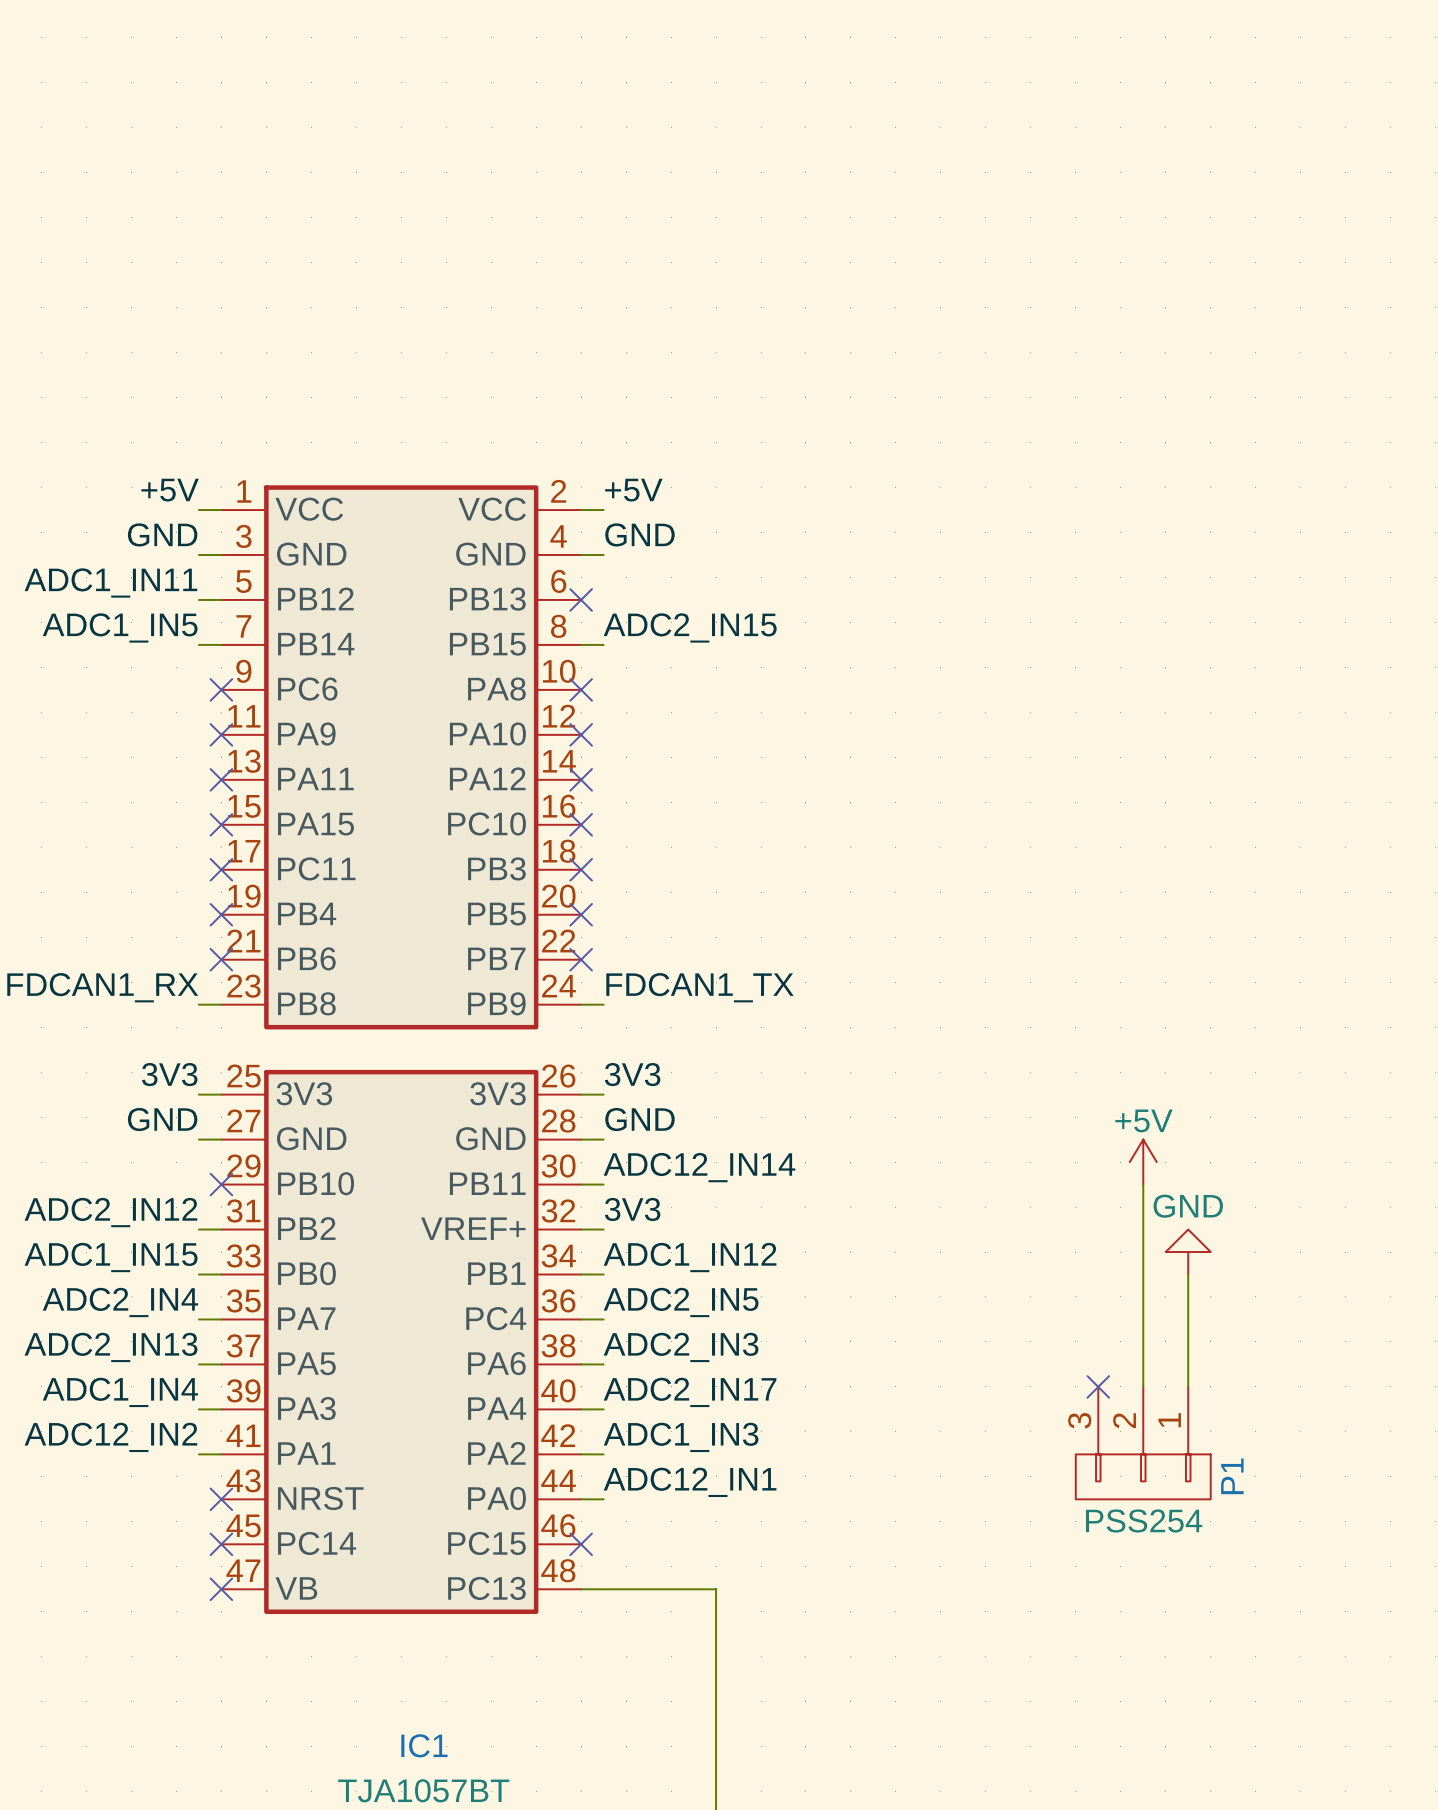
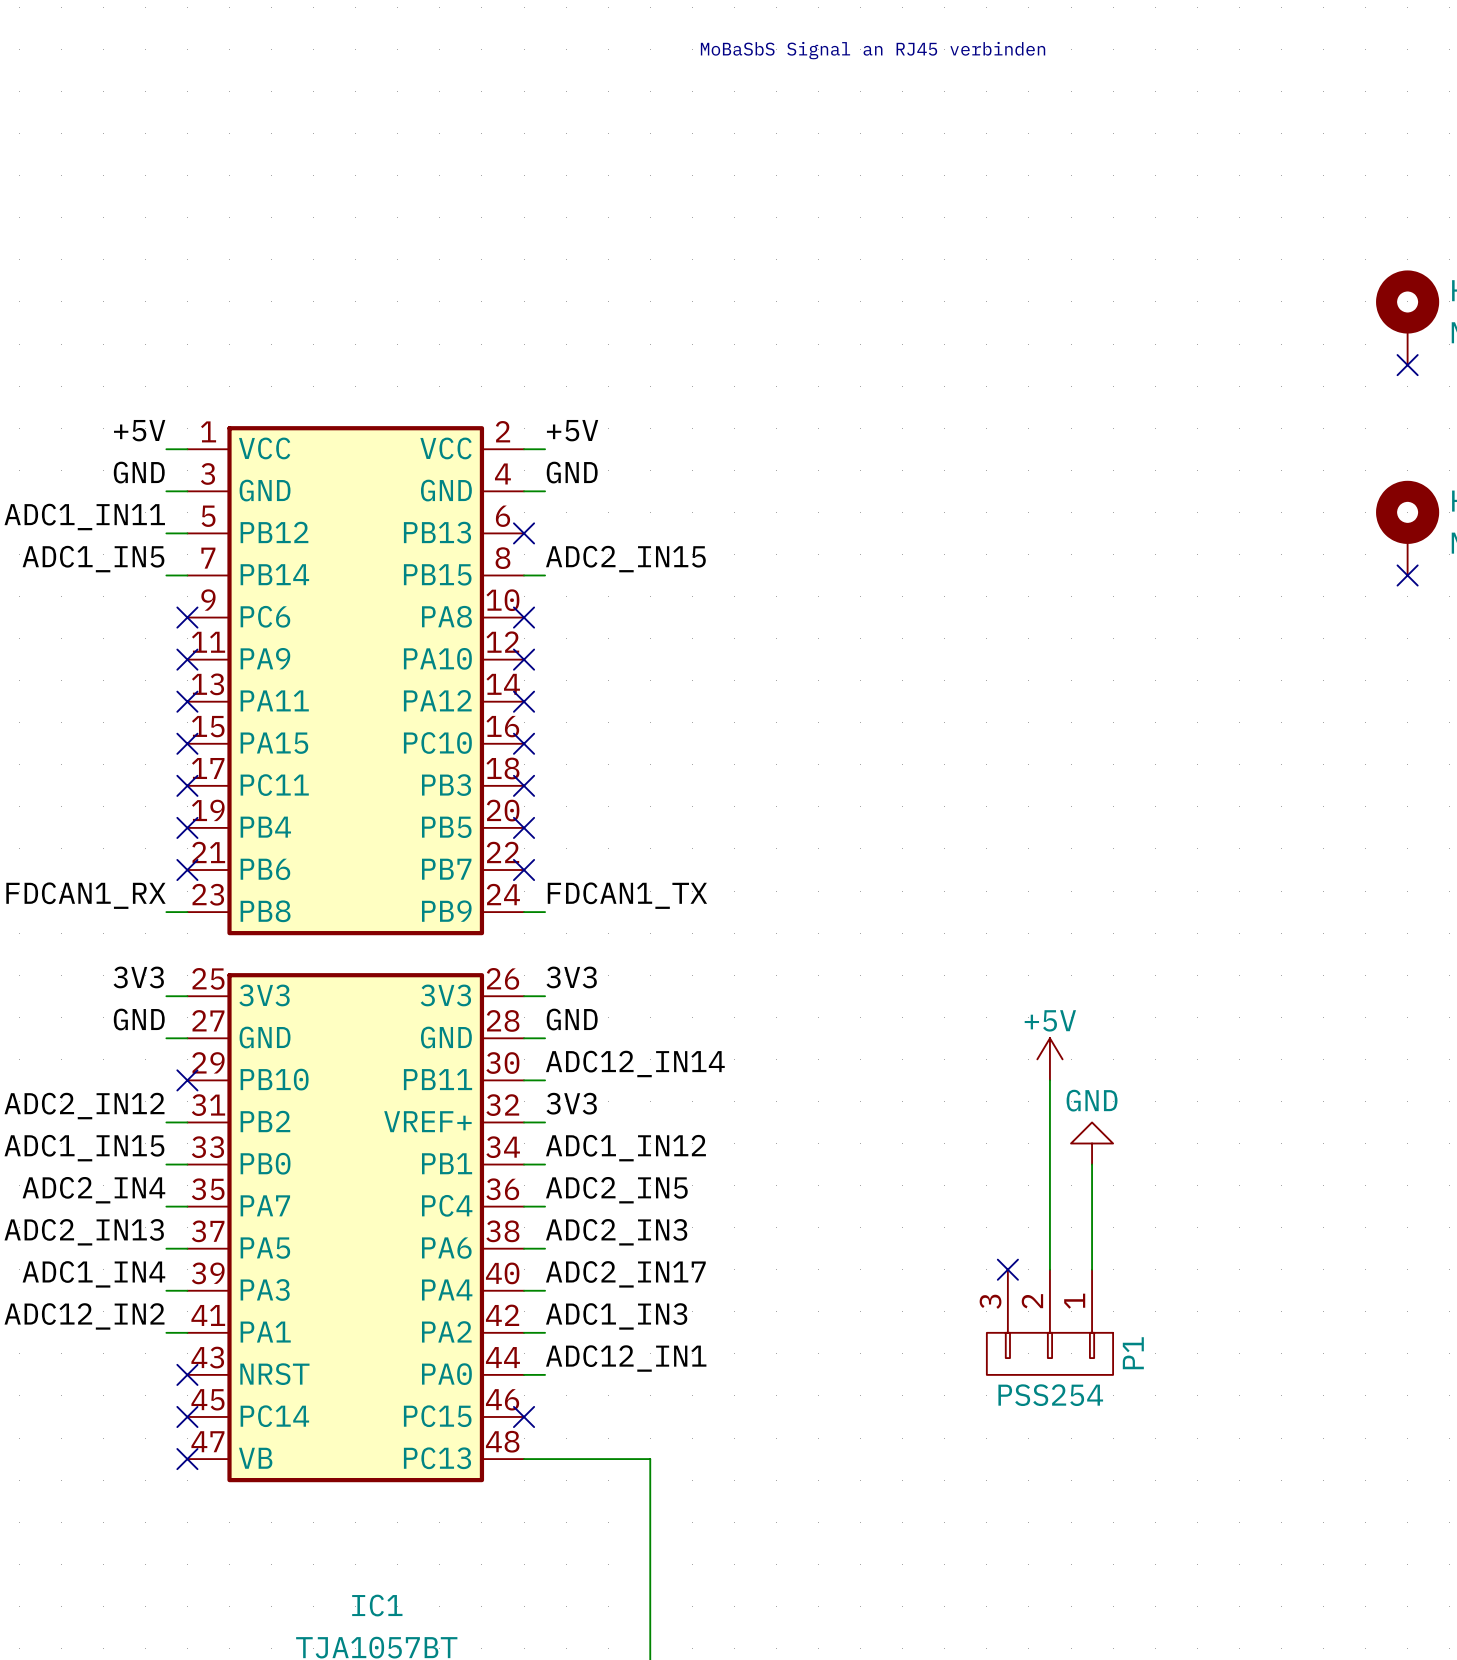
text: none -> MoBaSbS Signal an RJ45 verbinden (873, 50)

